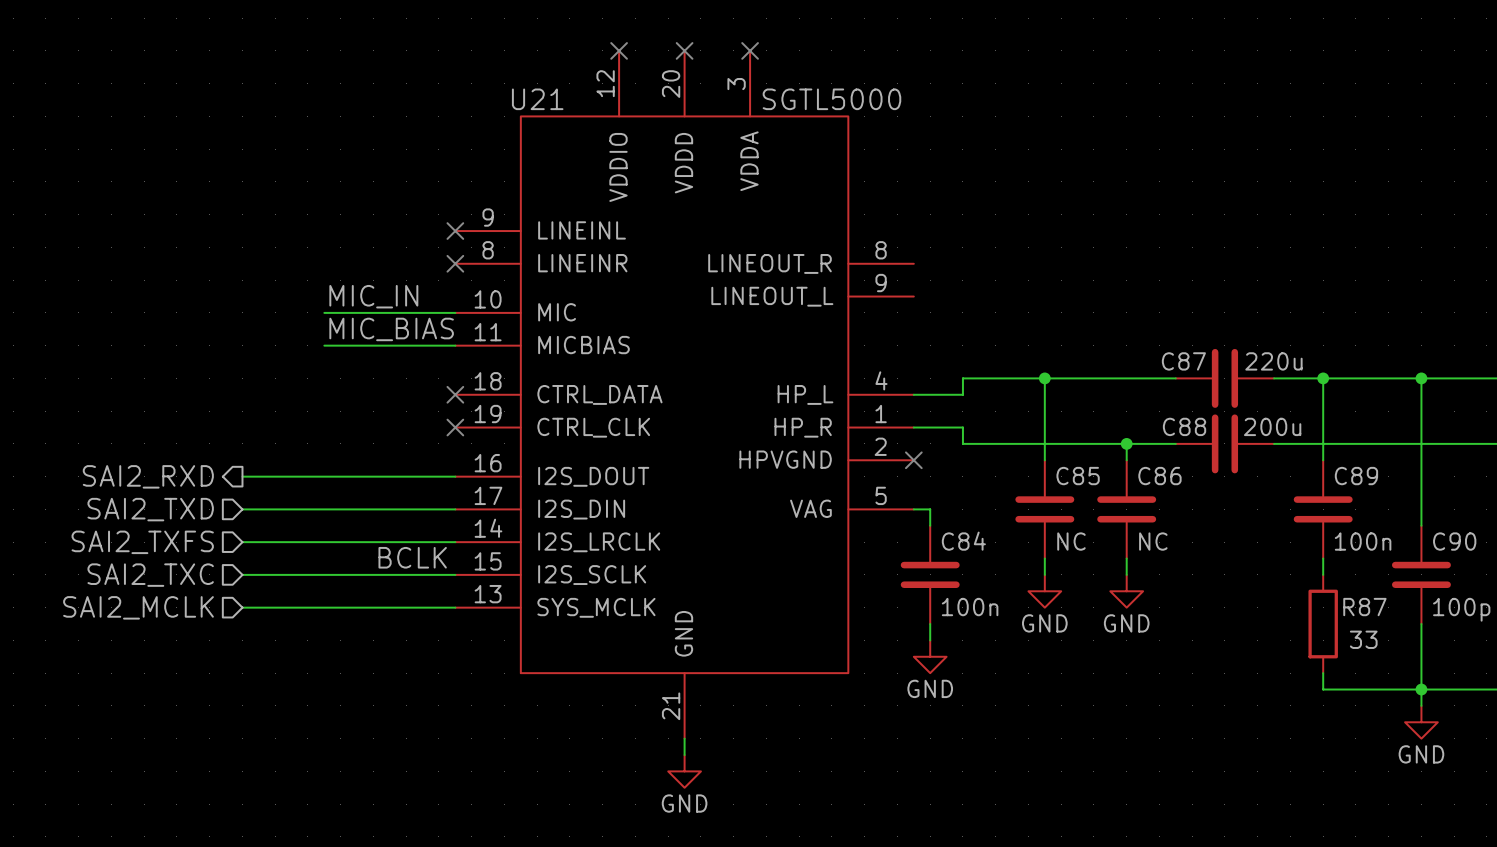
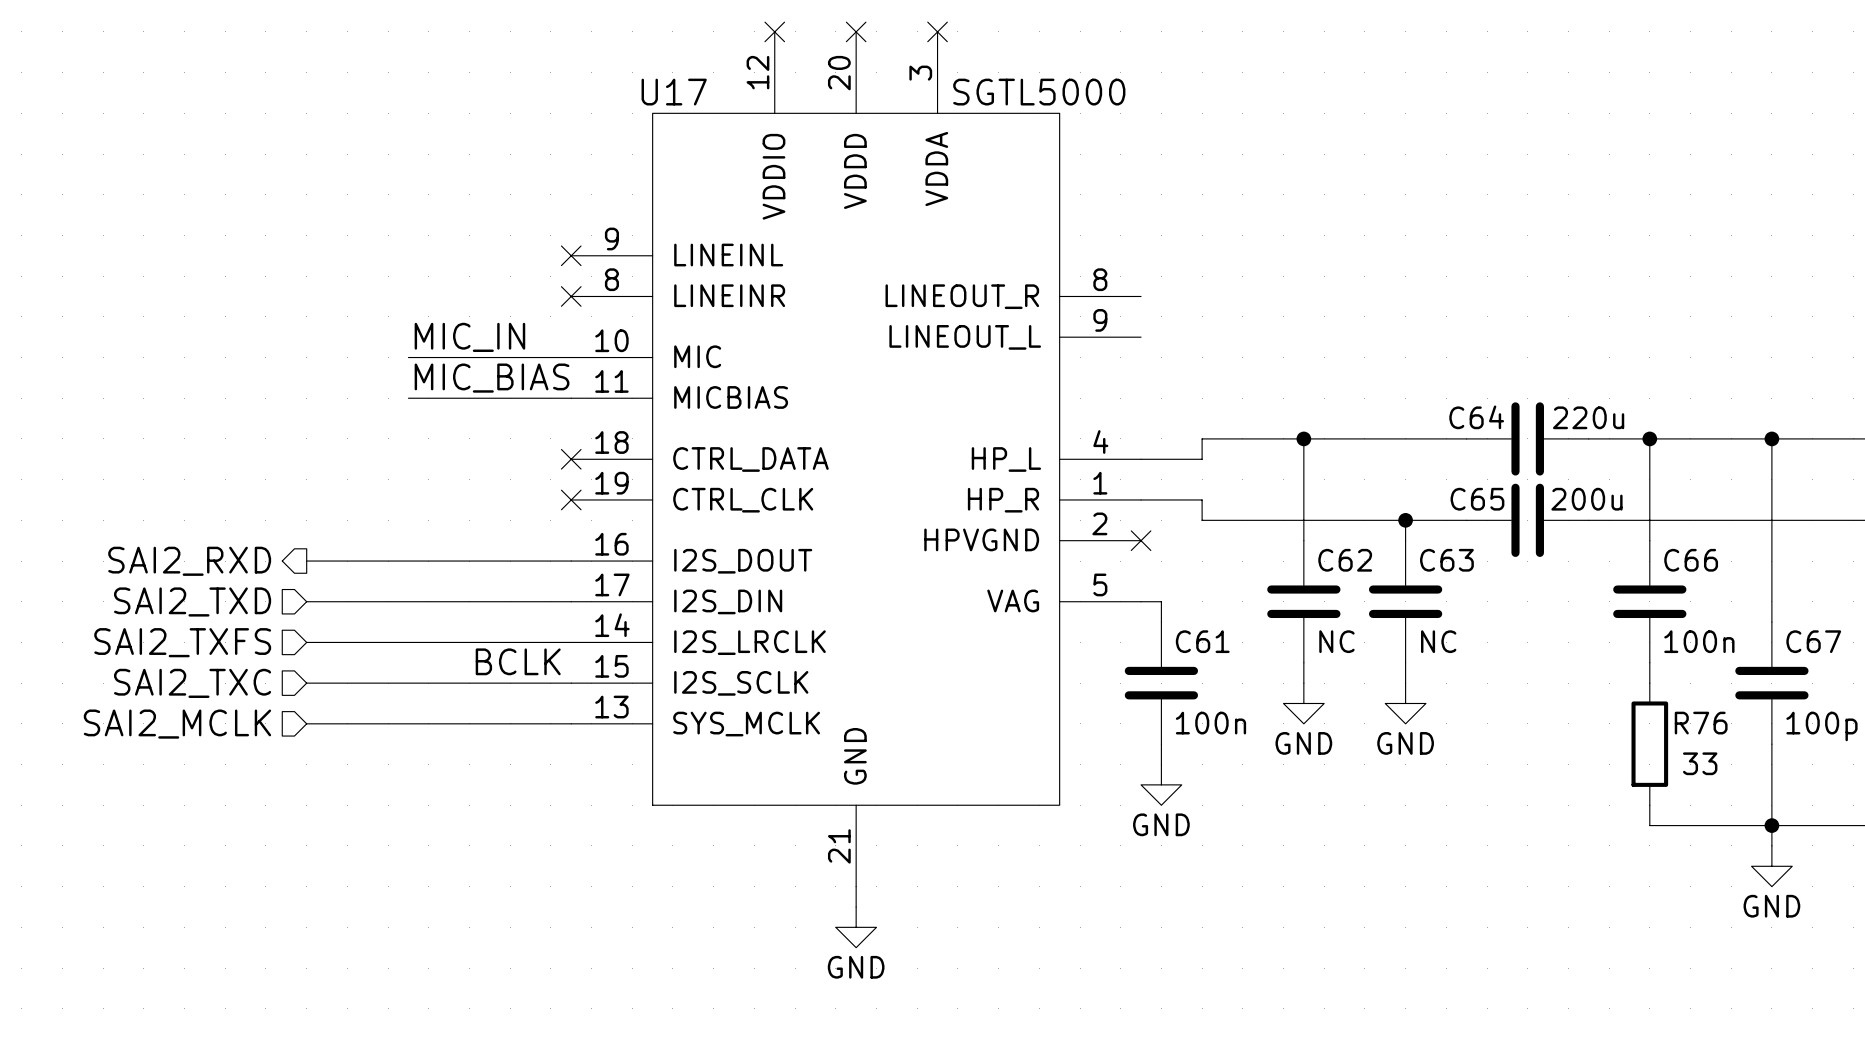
U21 name: U21 (537, 99) -> U17 (674, 92)
C87 name: C87 (1183, 361) -> C64 (1476, 417)
C88 name: C88 (1184, 426) -> C65 (1477, 499)
C85 name: C85 (1078, 476) -> C62 (1345, 560)
C86 name: C86 (1159, 476) -> C63 (1446, 560)
C89 name: C89 (1356, 476) -> C66 (1691, 560)
C84 name: C84 (963, 541) -> C61 (1202, 641)
C90 name: C90 (1454, 541) -> C67 (1813, 641)
R87 name: R87 (1364, 607) -> R76 (1701, 723)

